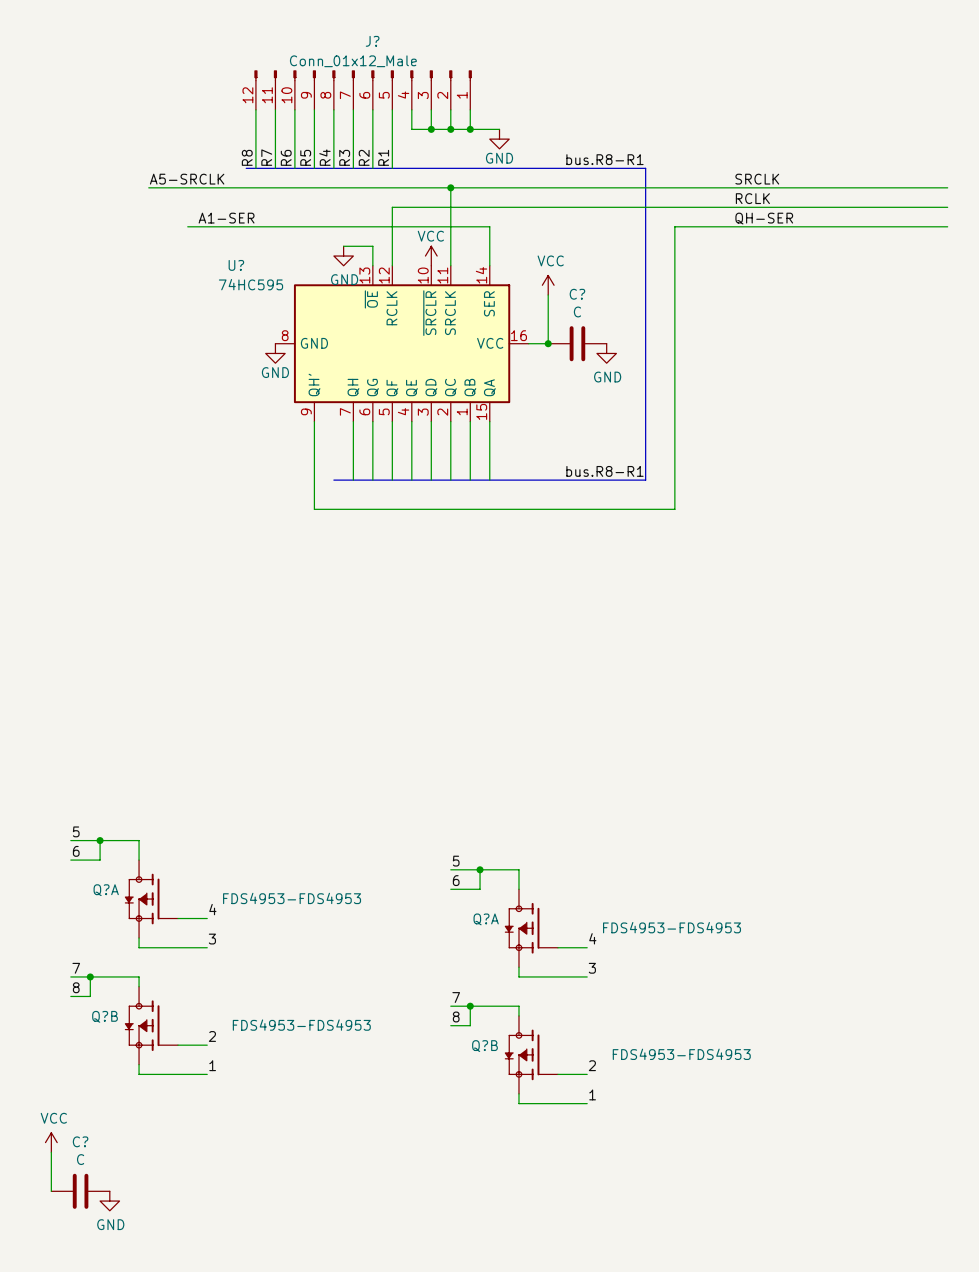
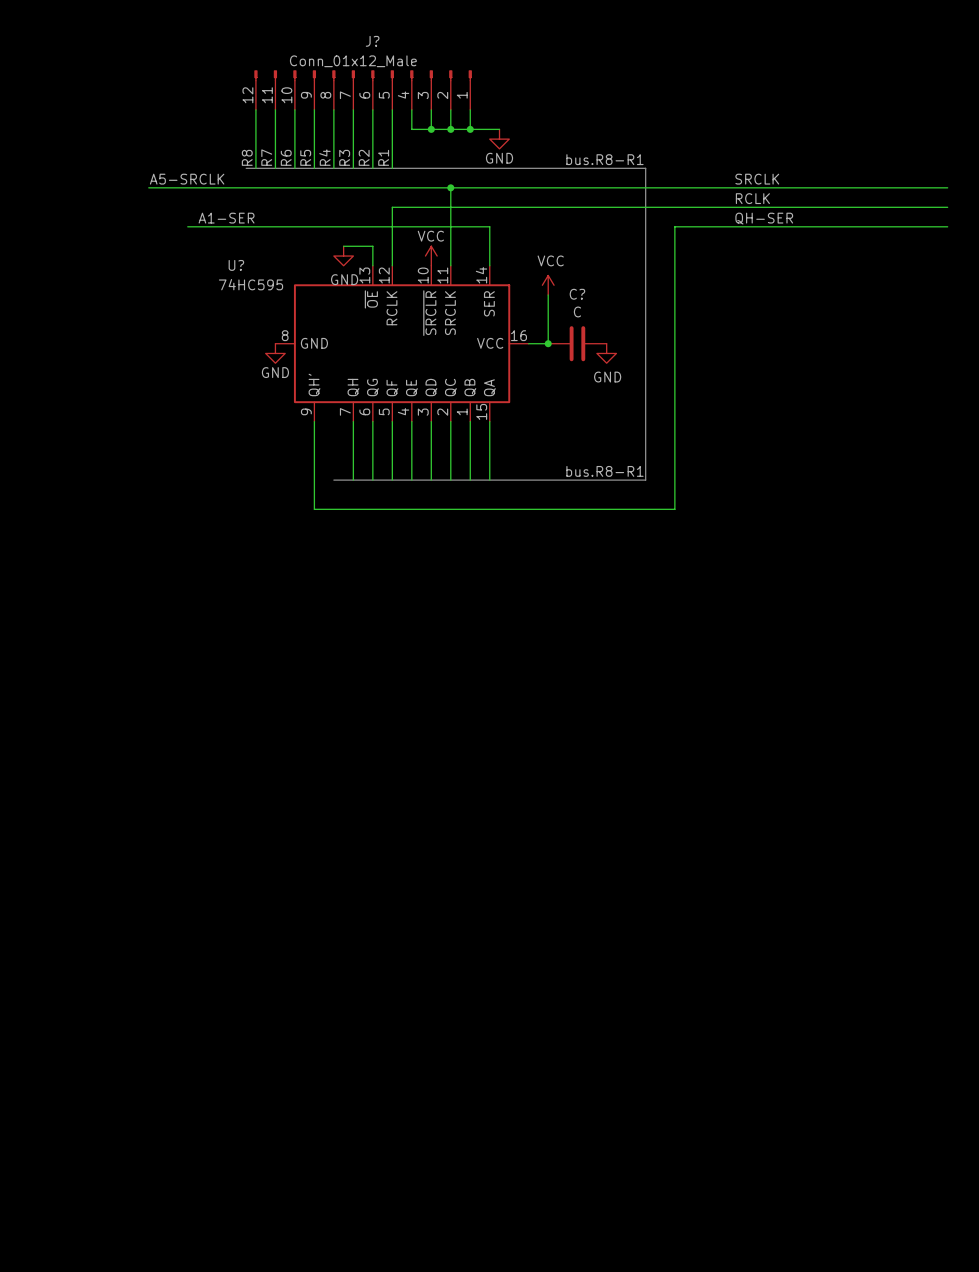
label: 5 (76, 831) -> none
wire: (70, 840) (139, 840) (139, 860) -> none
wire: (100, 840) (100, 860) (70, 860) -> none
junction: (100, 840) -> none
label: 6 (76, 851) -> none
label: 5 (456, 861) -> none
wire: (450, 869) (518, 869) (518, 889) -> none
wire: (480, 869) (480, 889) (450, 889) -> none
junction: (480, 869) -> none
label: 6 (456, 880) -> none
Q?A: FDS4953-FDS4953 (151, 899) -> none
label: 4 (212, 909) -> none
wire: (178, 918) (207, 918) -> none
Q?A: FDS4953-FDS4953 (531, 928) -> none
wire: (139, 938) (139, 947) (207, 947) -> none
label: 4 (592, 938) -> none
label: 3 (212, 939) -> none
wire: (557, 947) (587, 947) -> none
wire: (518, 967) (518, 976) (587, 976) -> none
label: 7 (76, 968) -> none
label: 3 (592, 968) -> none
wire: (70, 976) (139, 976) (139, 986) -> none
wire: (90, 976) (90, 996) (70, 996) -> none
junction: (90, 976) -> none
label: 8 (76, 987) -> none
label: 7 (456, 997) -> none
wire: (450, 1006) (518, 1006) (518, 1015) -> none
wire: (470, 1006) (470, 1025) (450, 1025) -> none
junction: (470, 1006) -> none
label: 8 (456, 1016) -> none
Q?B: FDS4953-FDS4953 (151, 1025) -> none
label: 2 (212, 1036) -> none
wire: (178, 1045) (207, 1045) -> none
Q?B: FDS4953-FDS4953 (531, 1054) -> none
wire: (139, 1064) (139, 1074) (207, 1074) -> none
label: 1 (212, 1065) -> none
label: 2 (592, 1065) -> none
wire: (557, 1074) (587, 1074) -> none
wire: (518, 1093) (518, 1103) (587, 1103) -> none
label: 1 (592, 1094) -> none
power symbol: VCC (51, 1142) -> none
wire: (51, 1152) (51, 1191) -> none
C?: C (80, 1191) -> none
power symbol: GND (109, 1201) -> none

